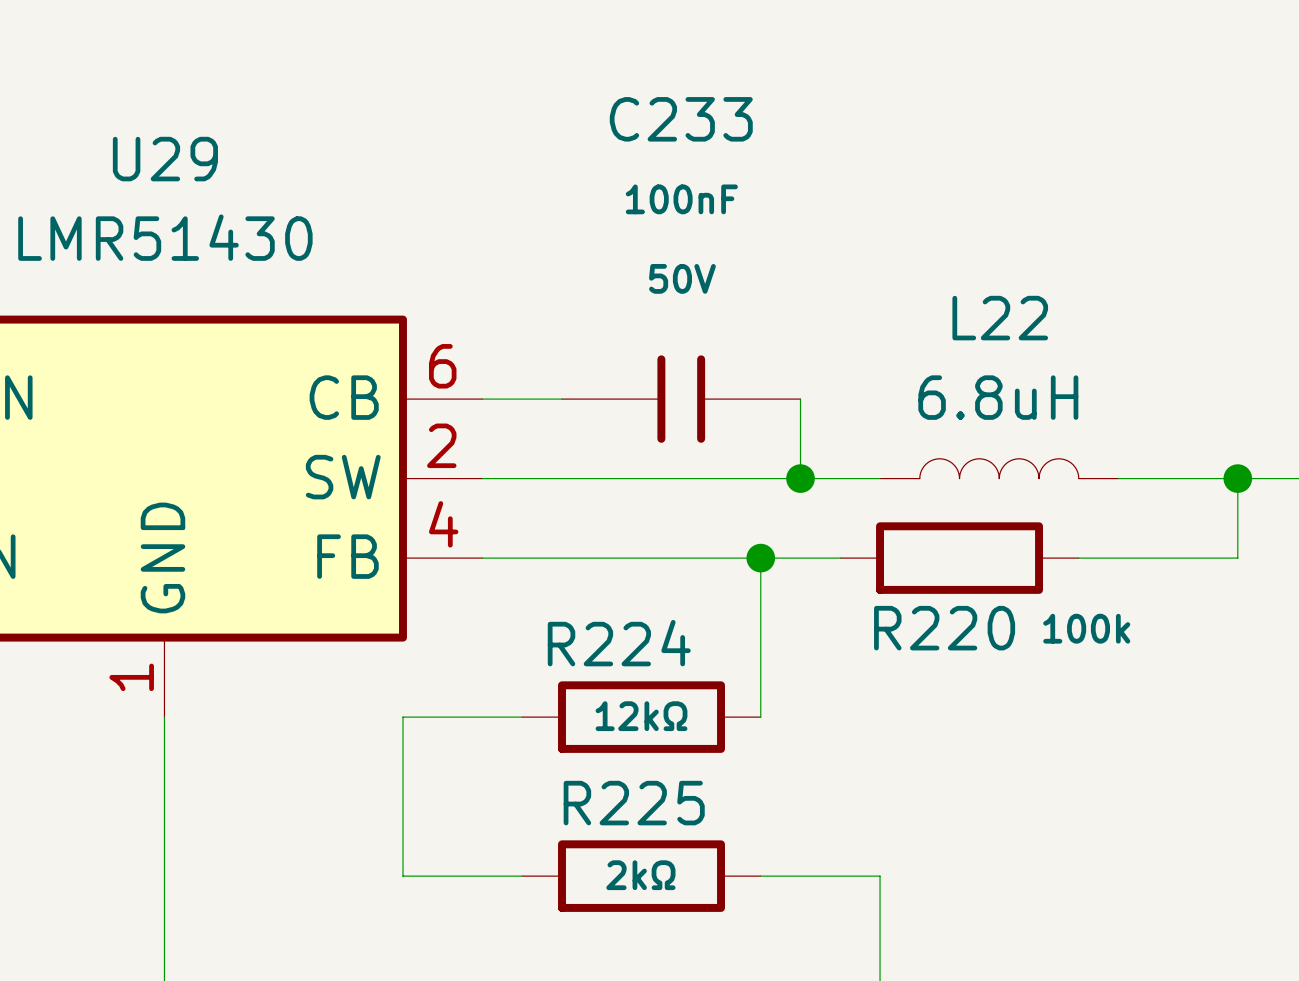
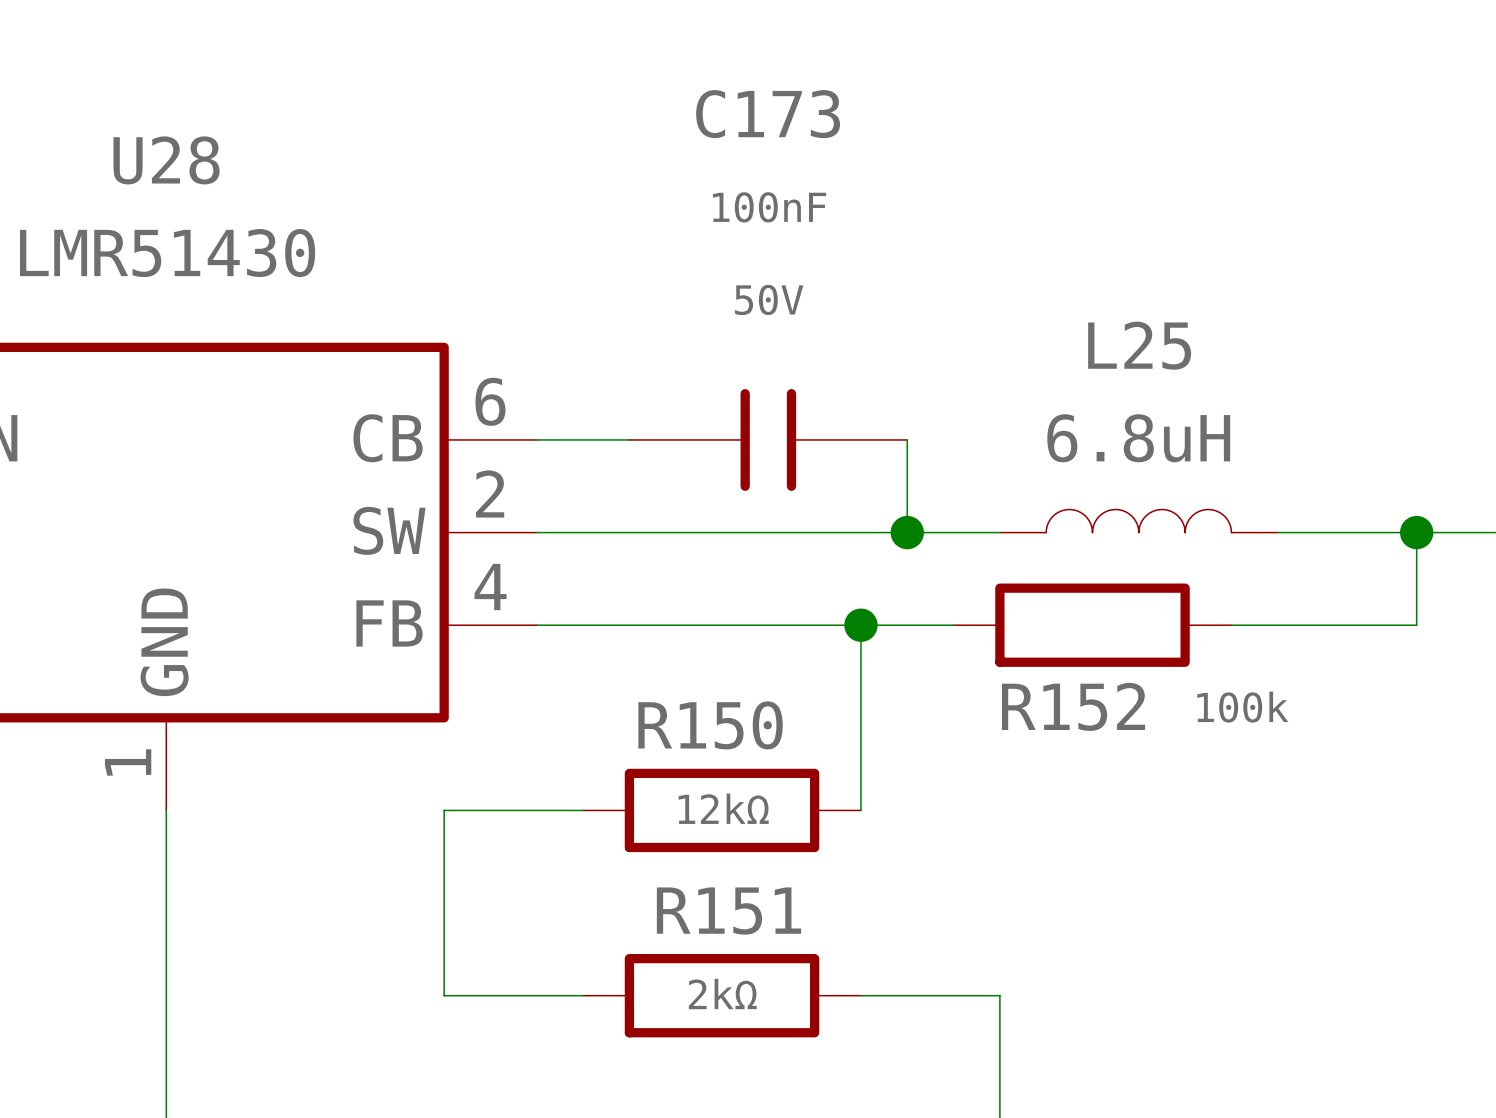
C233 name: C233 (681, 119) -> C173 (768, 114)
U29 name: U29 (165, 159) -> U28 (166, 160)
L22 name: L22 (1000, 318) -> L25 (1139, 345)
R220 name: R220 (944, 628) -> R152 (1073, 706)
R224 name: R224 (619, 643) -> R150 (710, 725)
R225 name: R225 (634, 803) -> R151 (728, 911)

